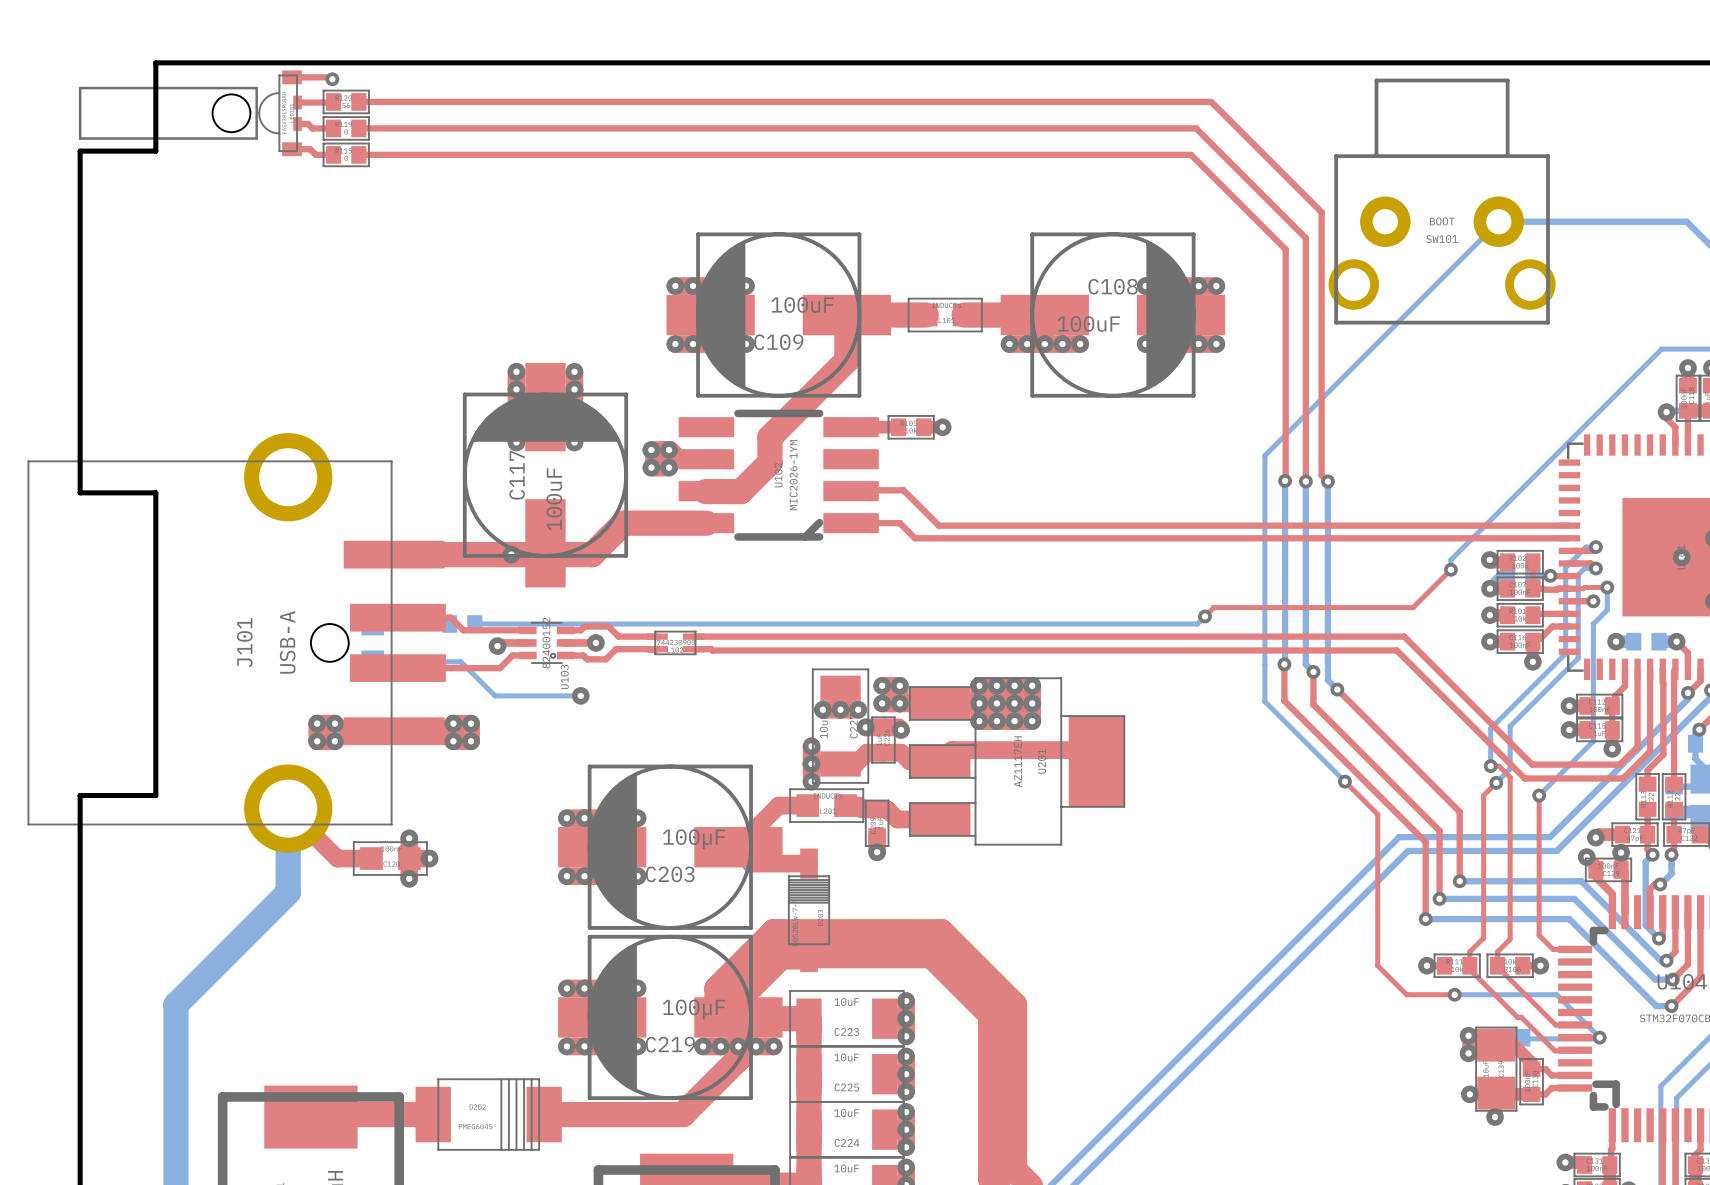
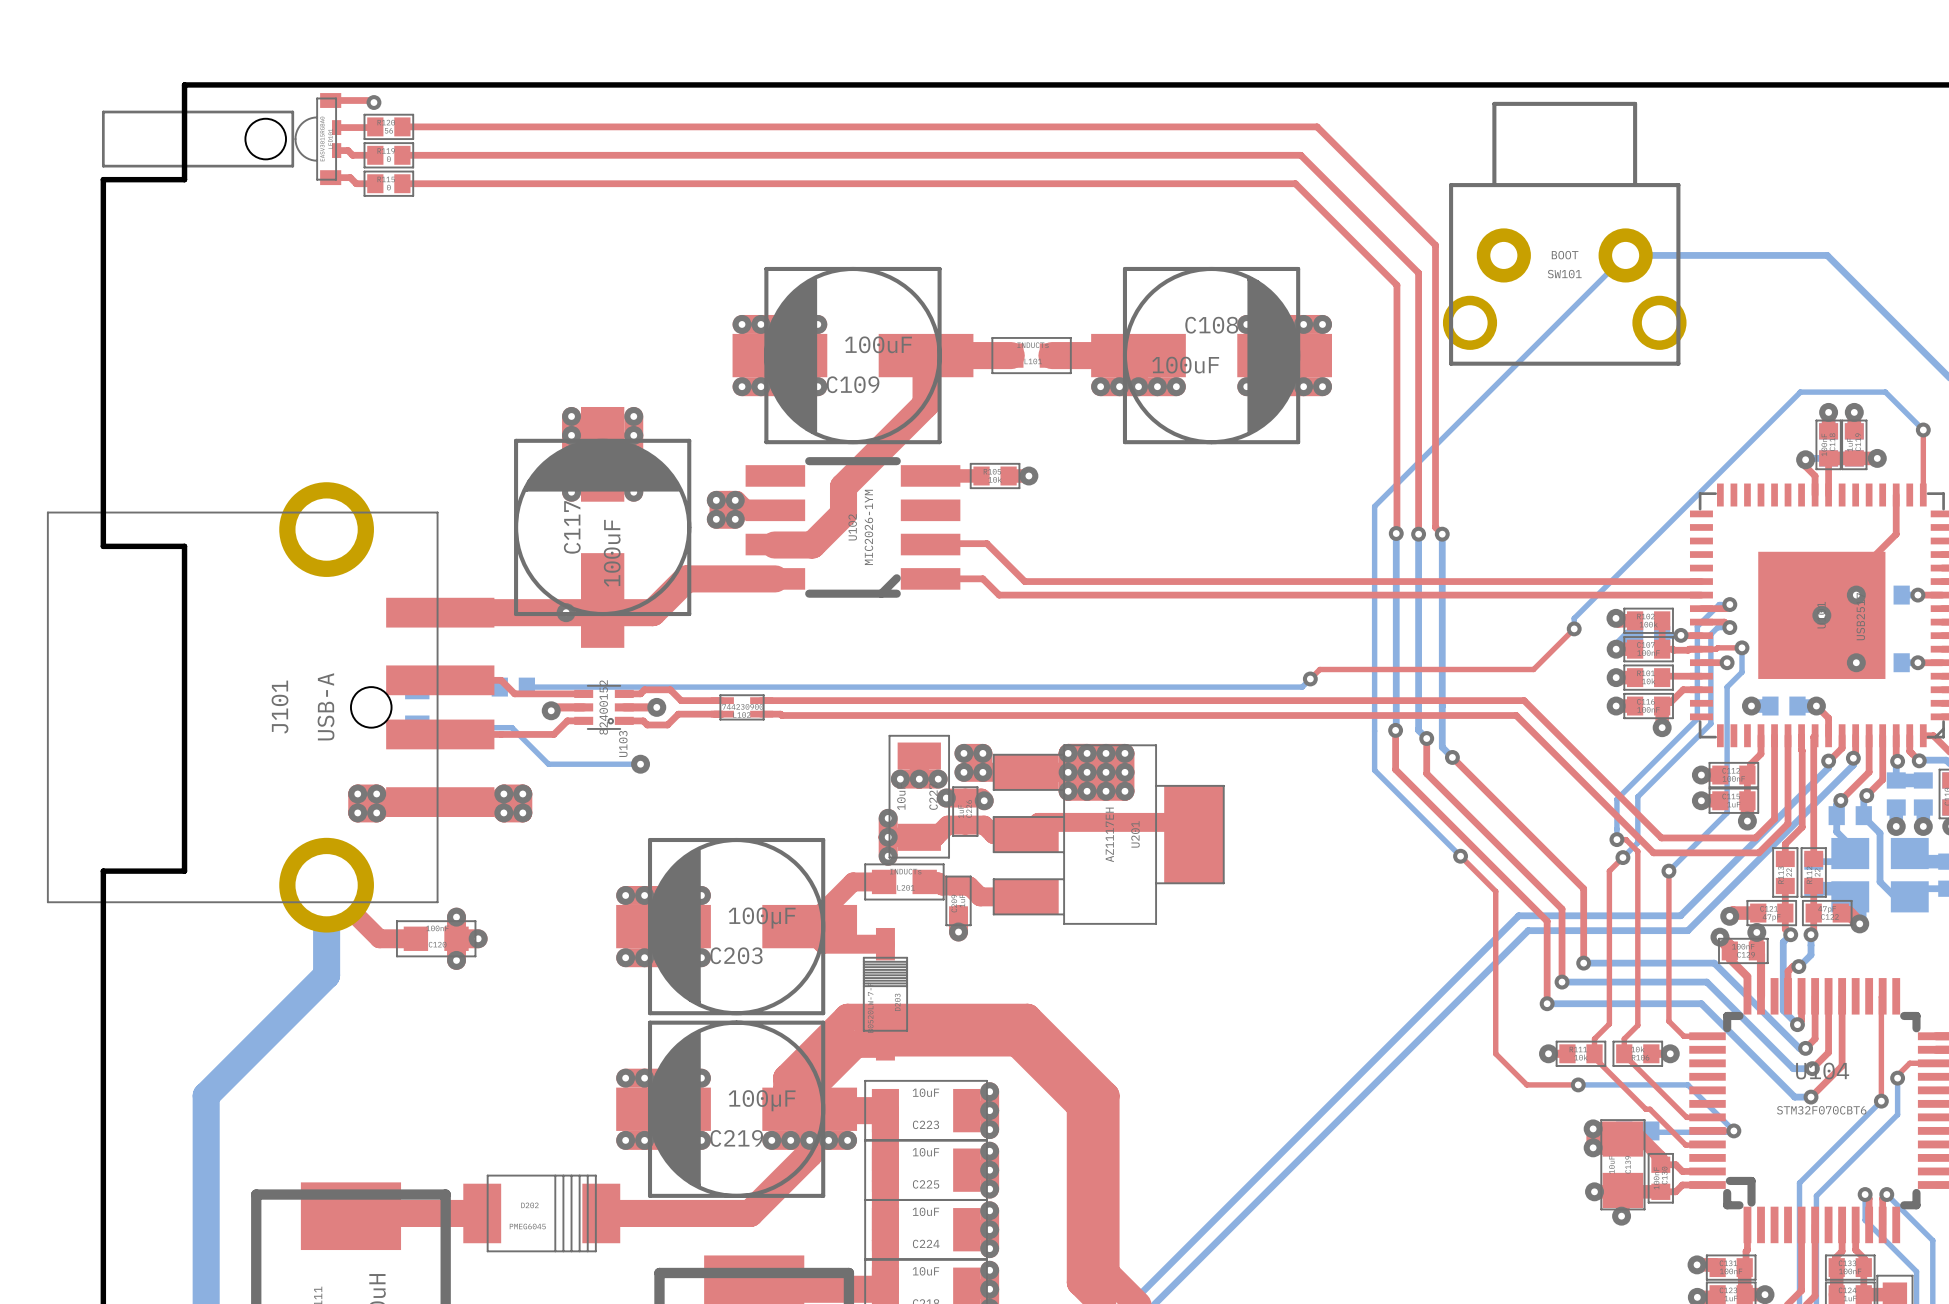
J101 footprint: [28, 433, 446, 853] -> [47, 482, 495, 933]

